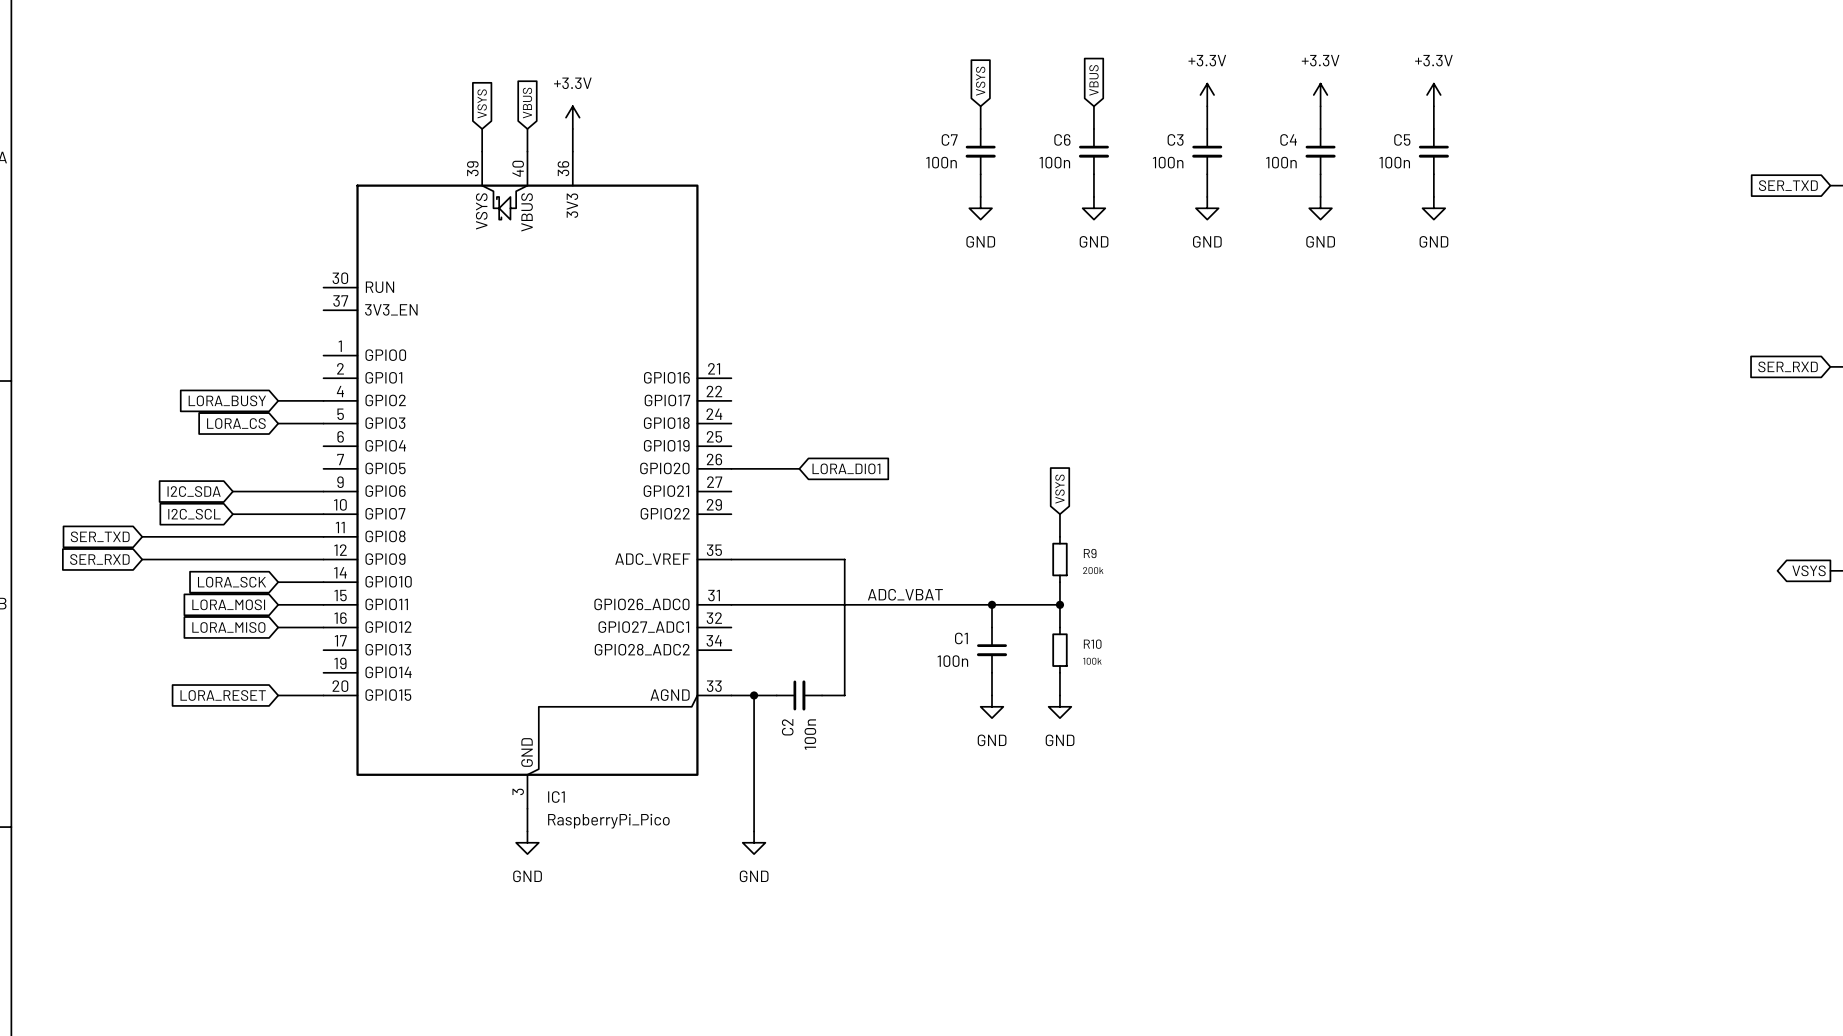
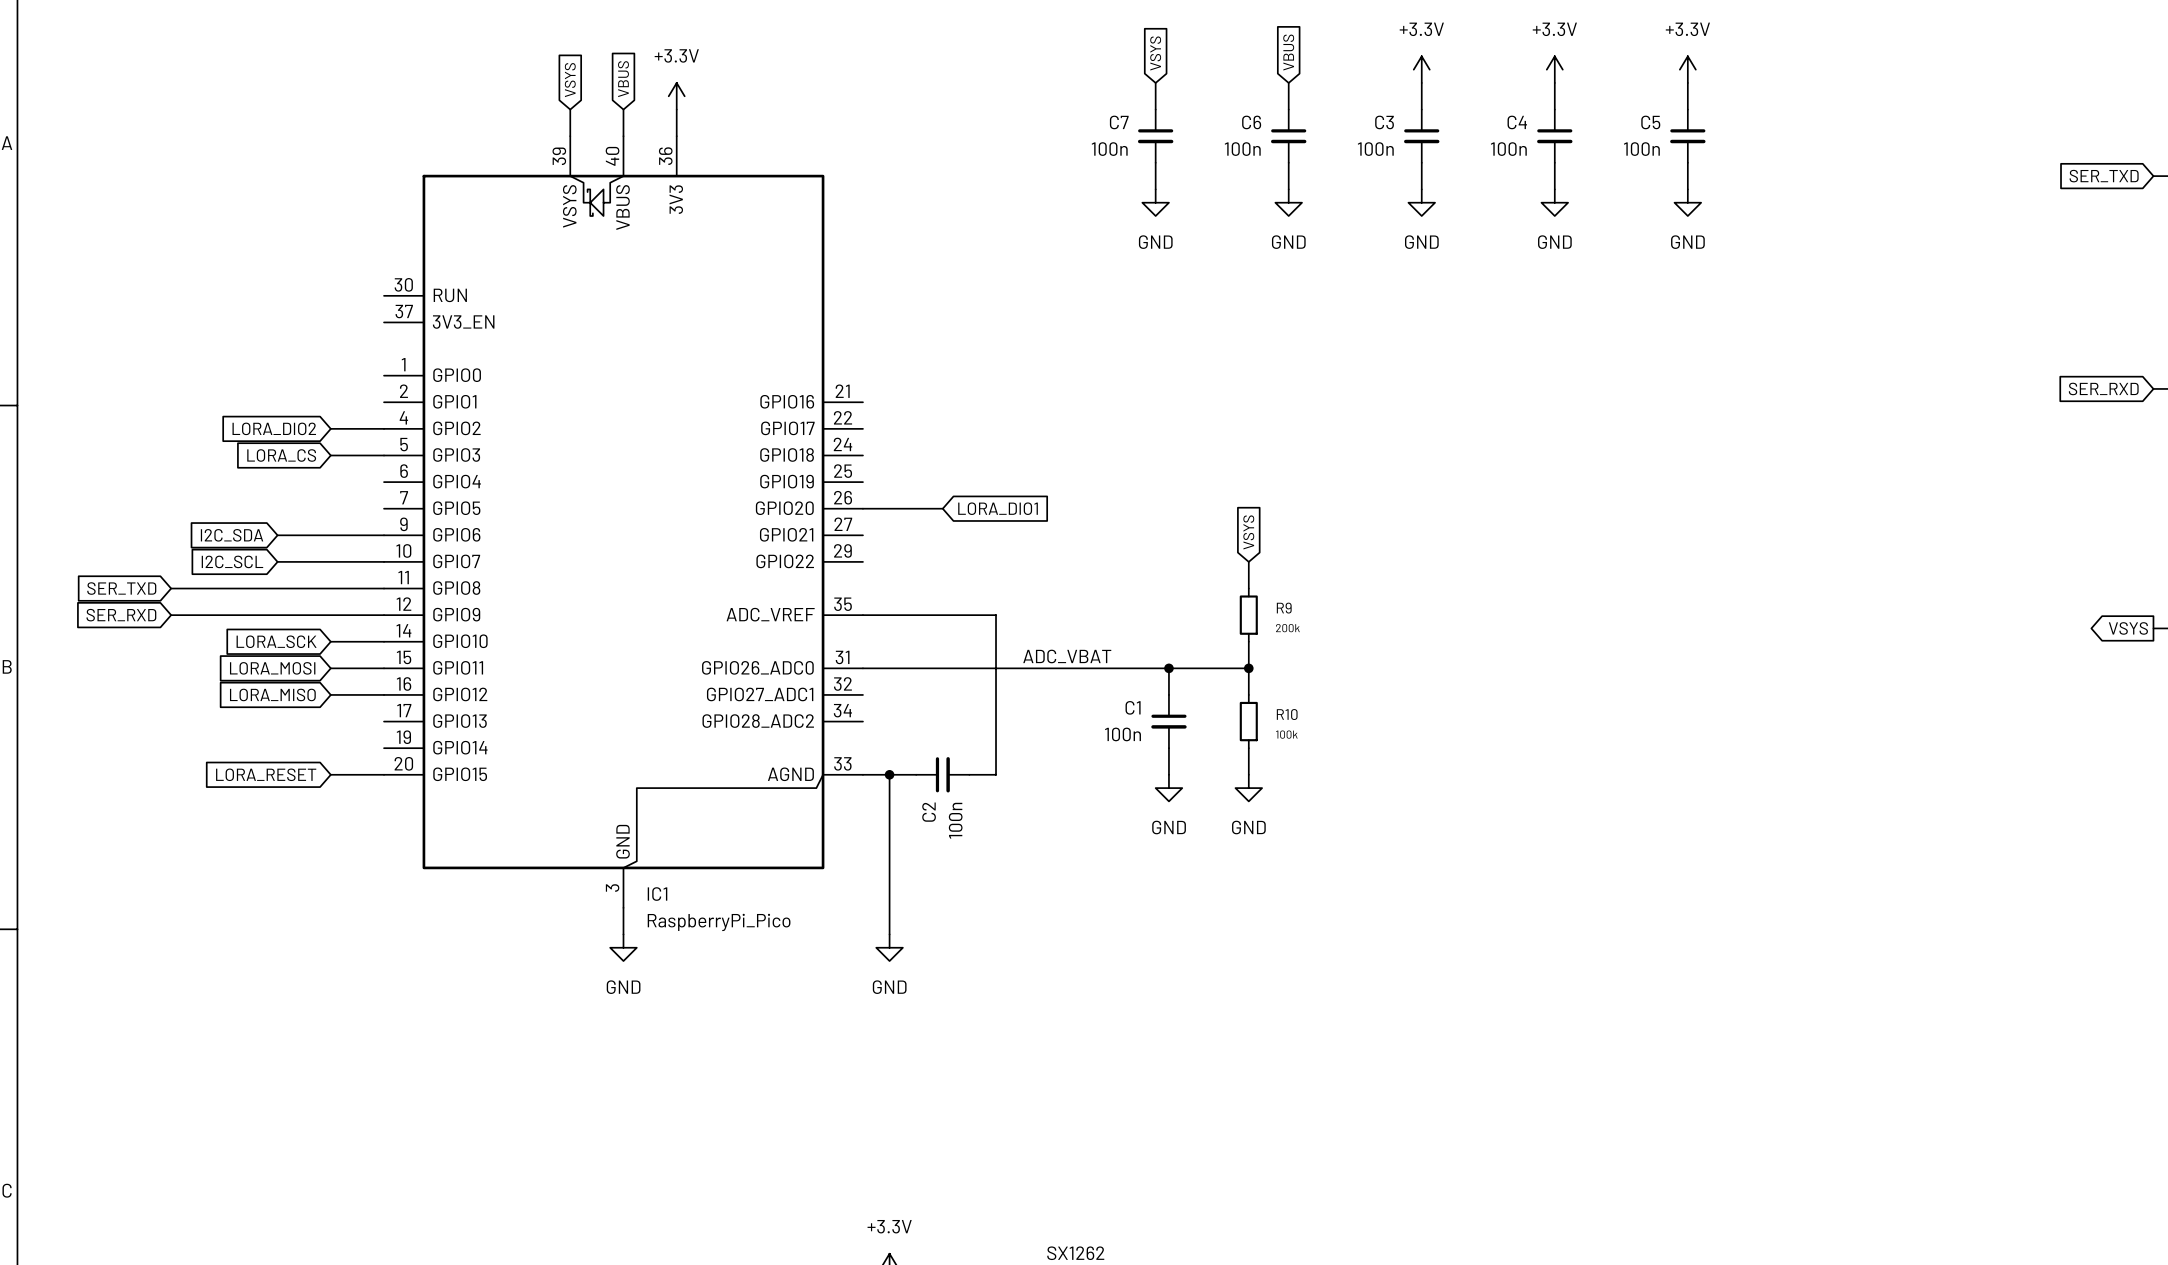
global label: LORA_BUSY (227, 400) -> LORA_DIO2 (274, 428)

